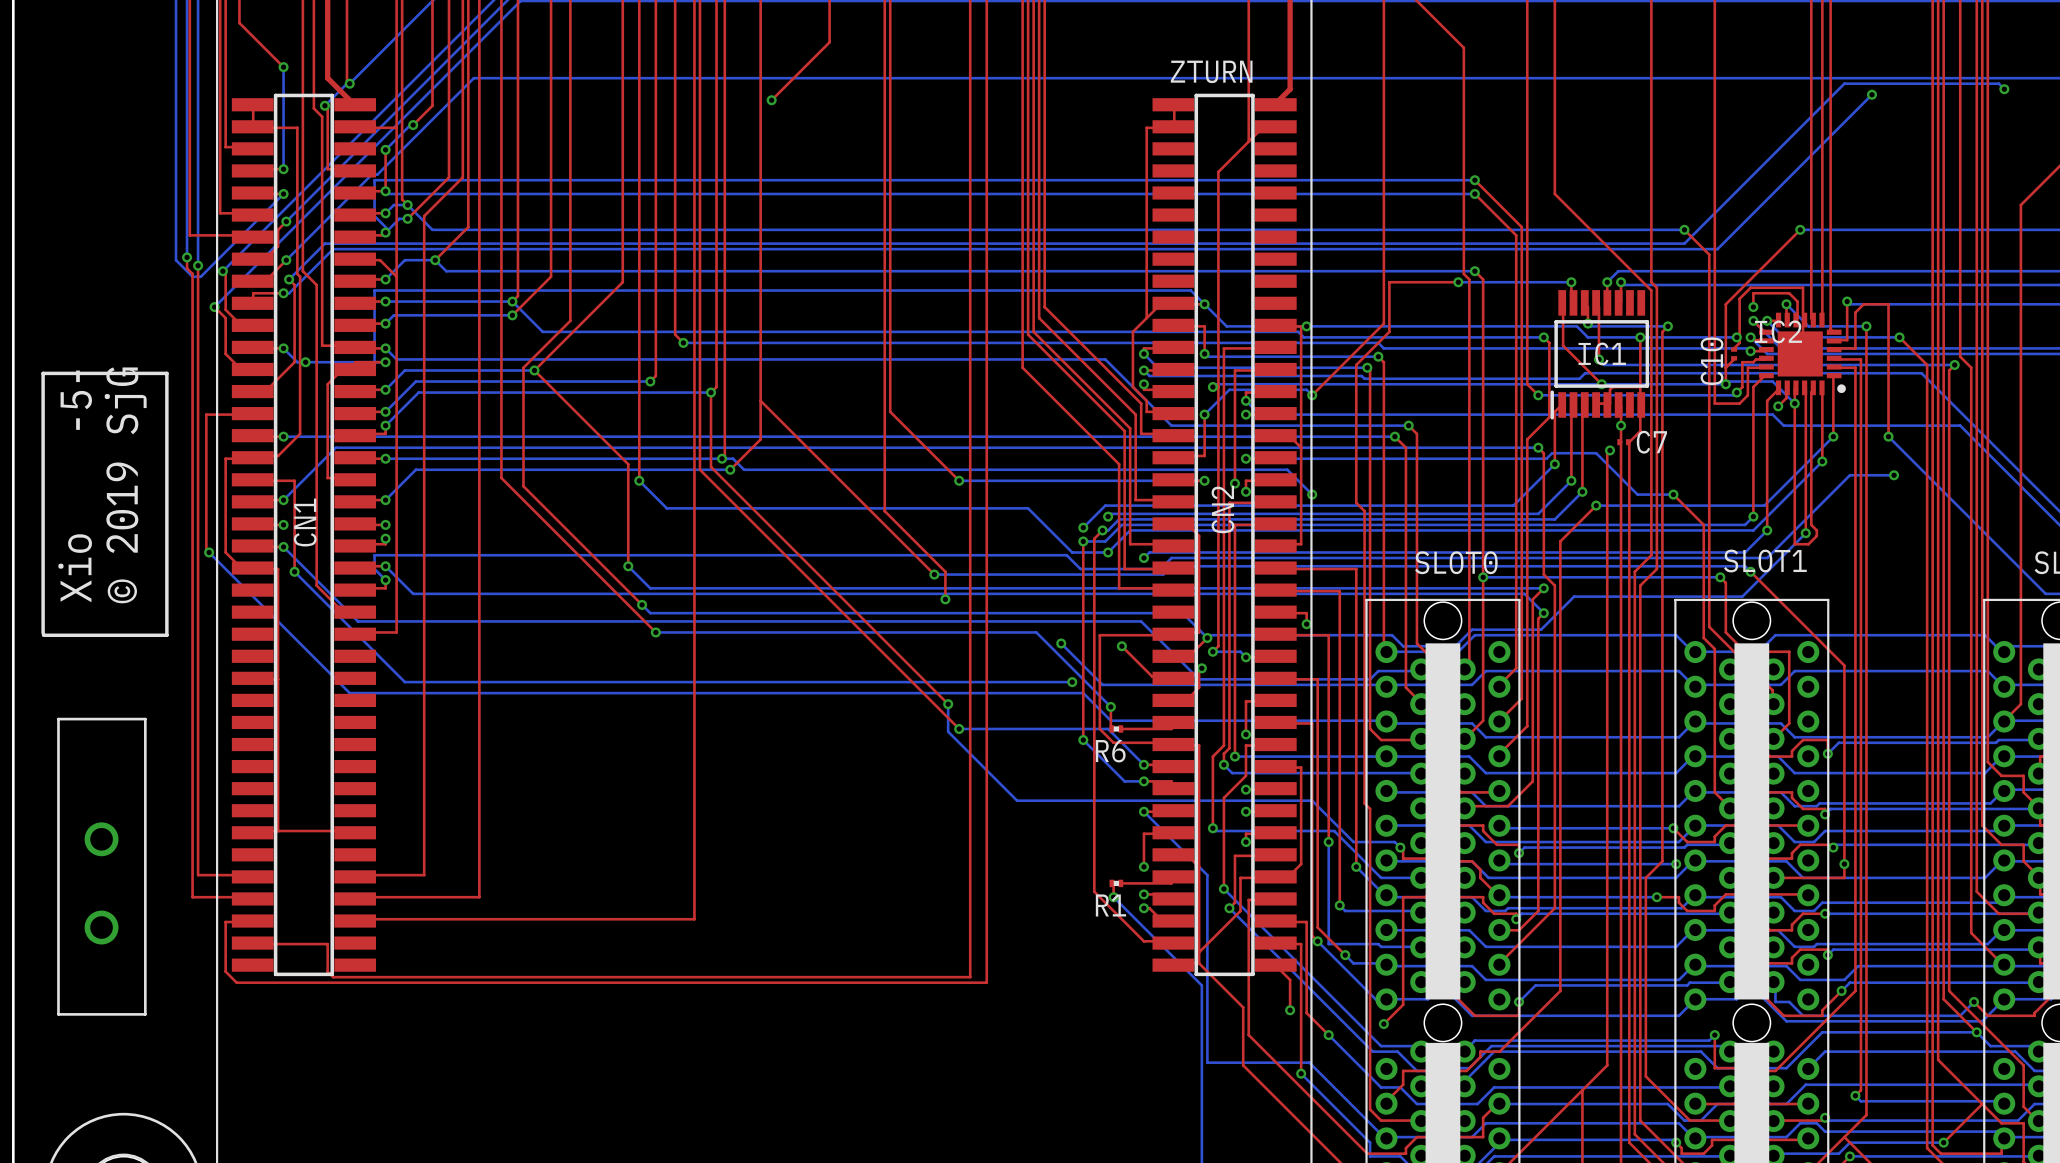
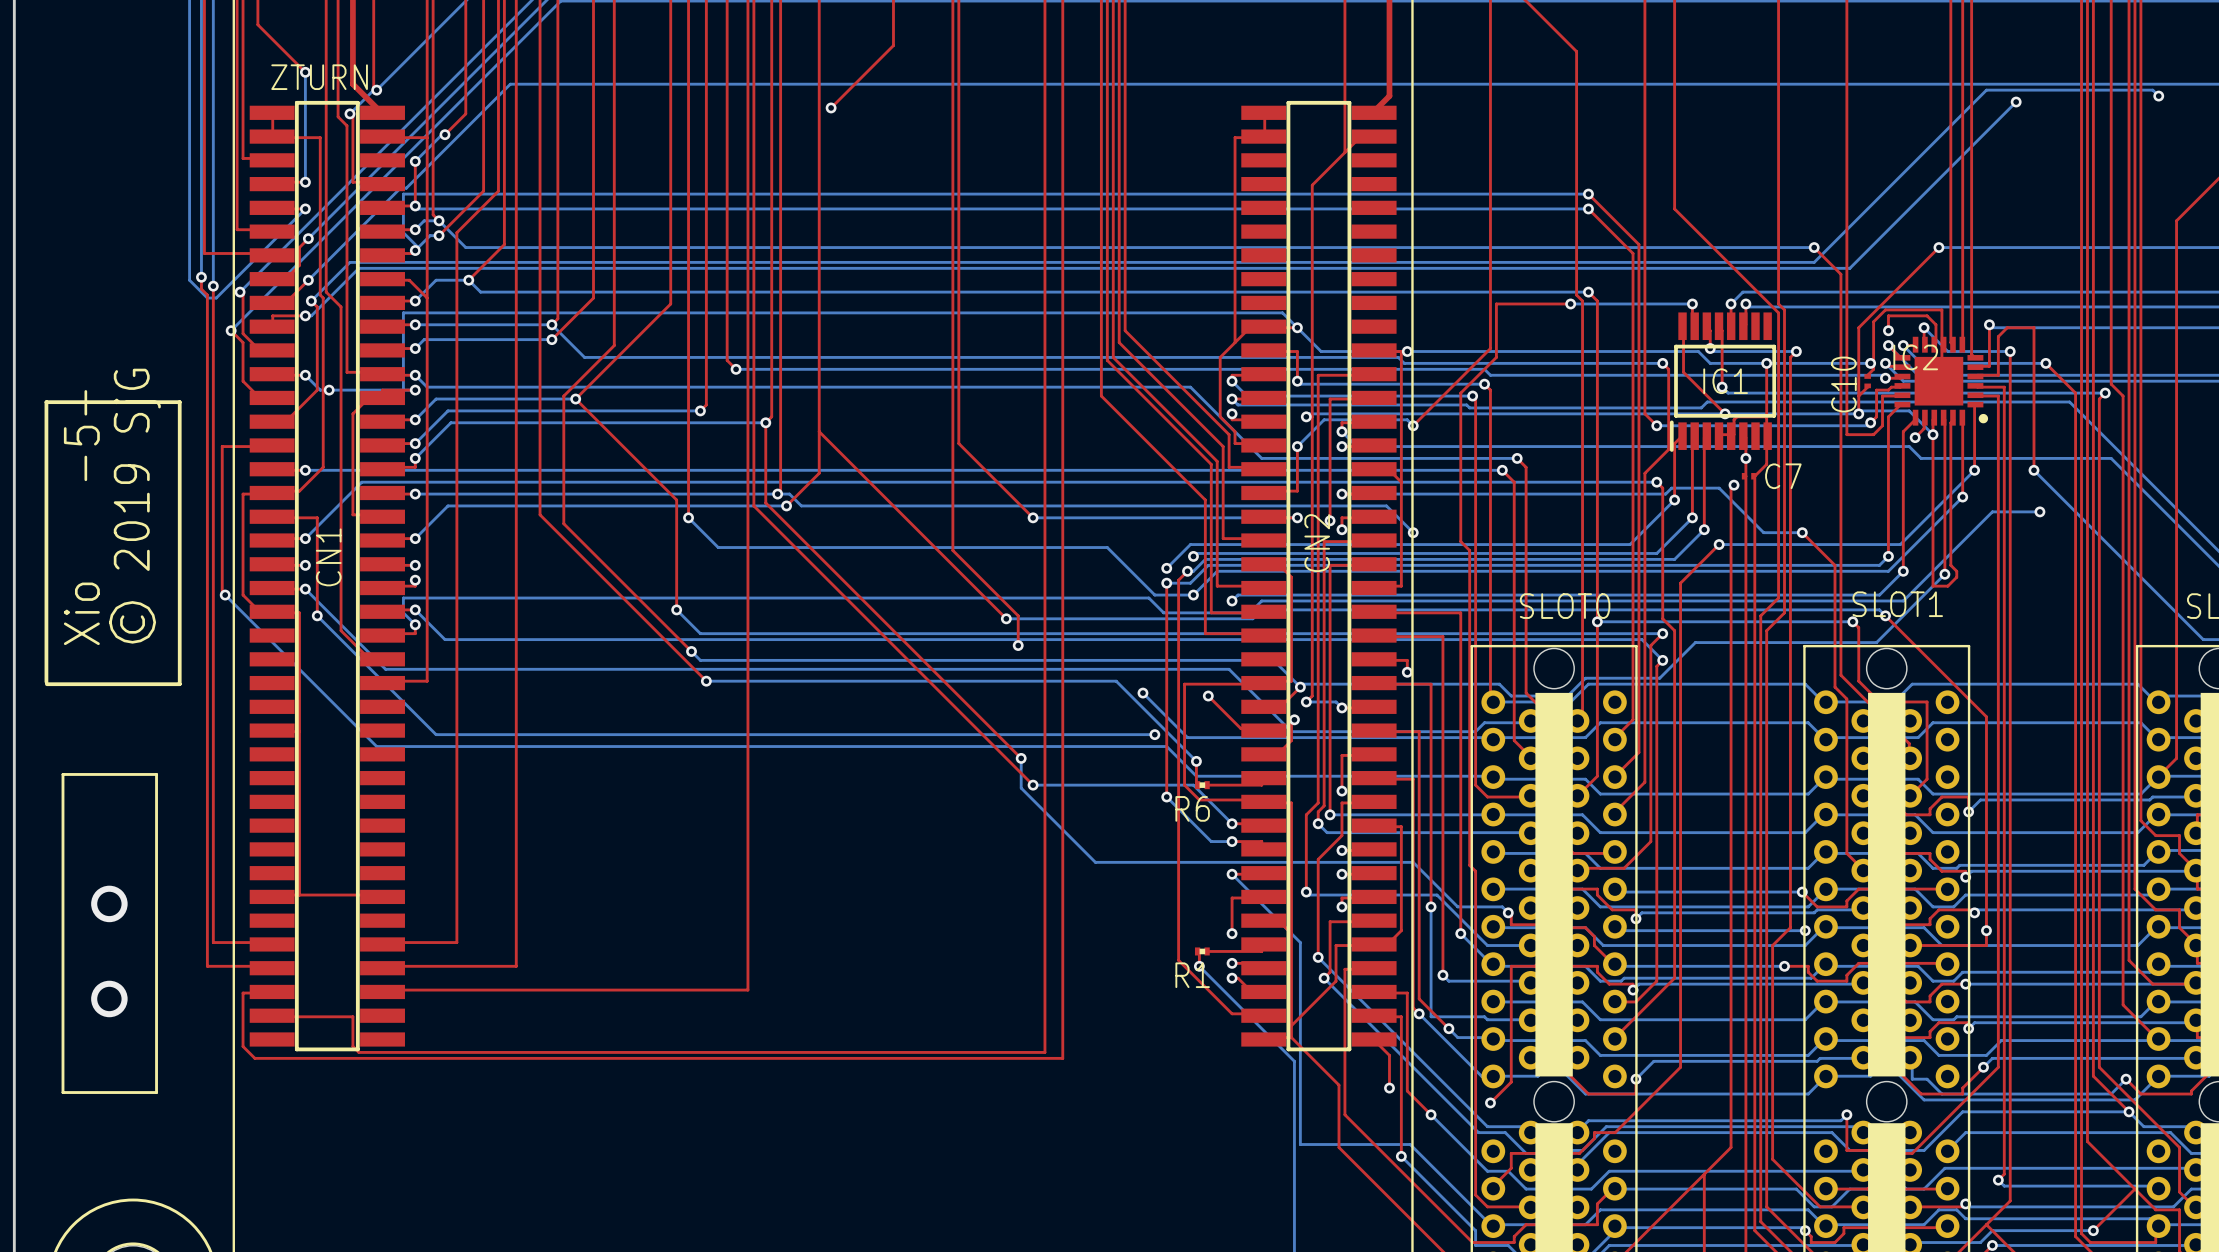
ZTURN name position: ZTURN (1211, 71) -> ZTURN (319, 77)

